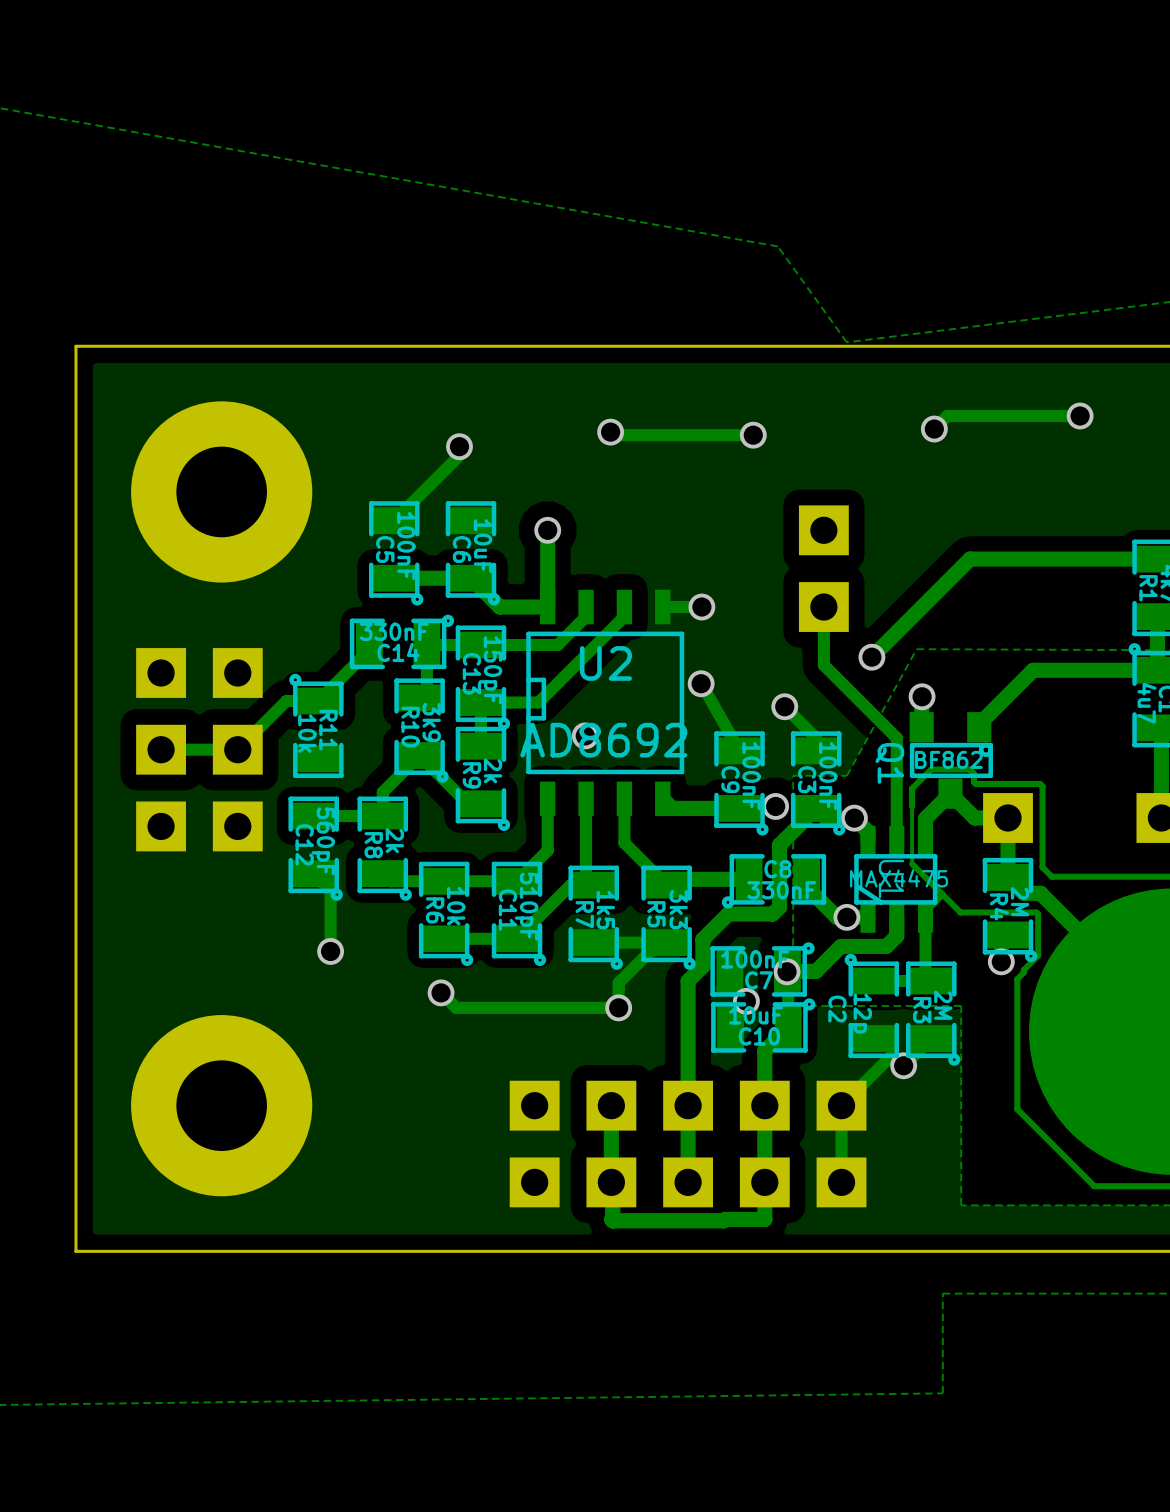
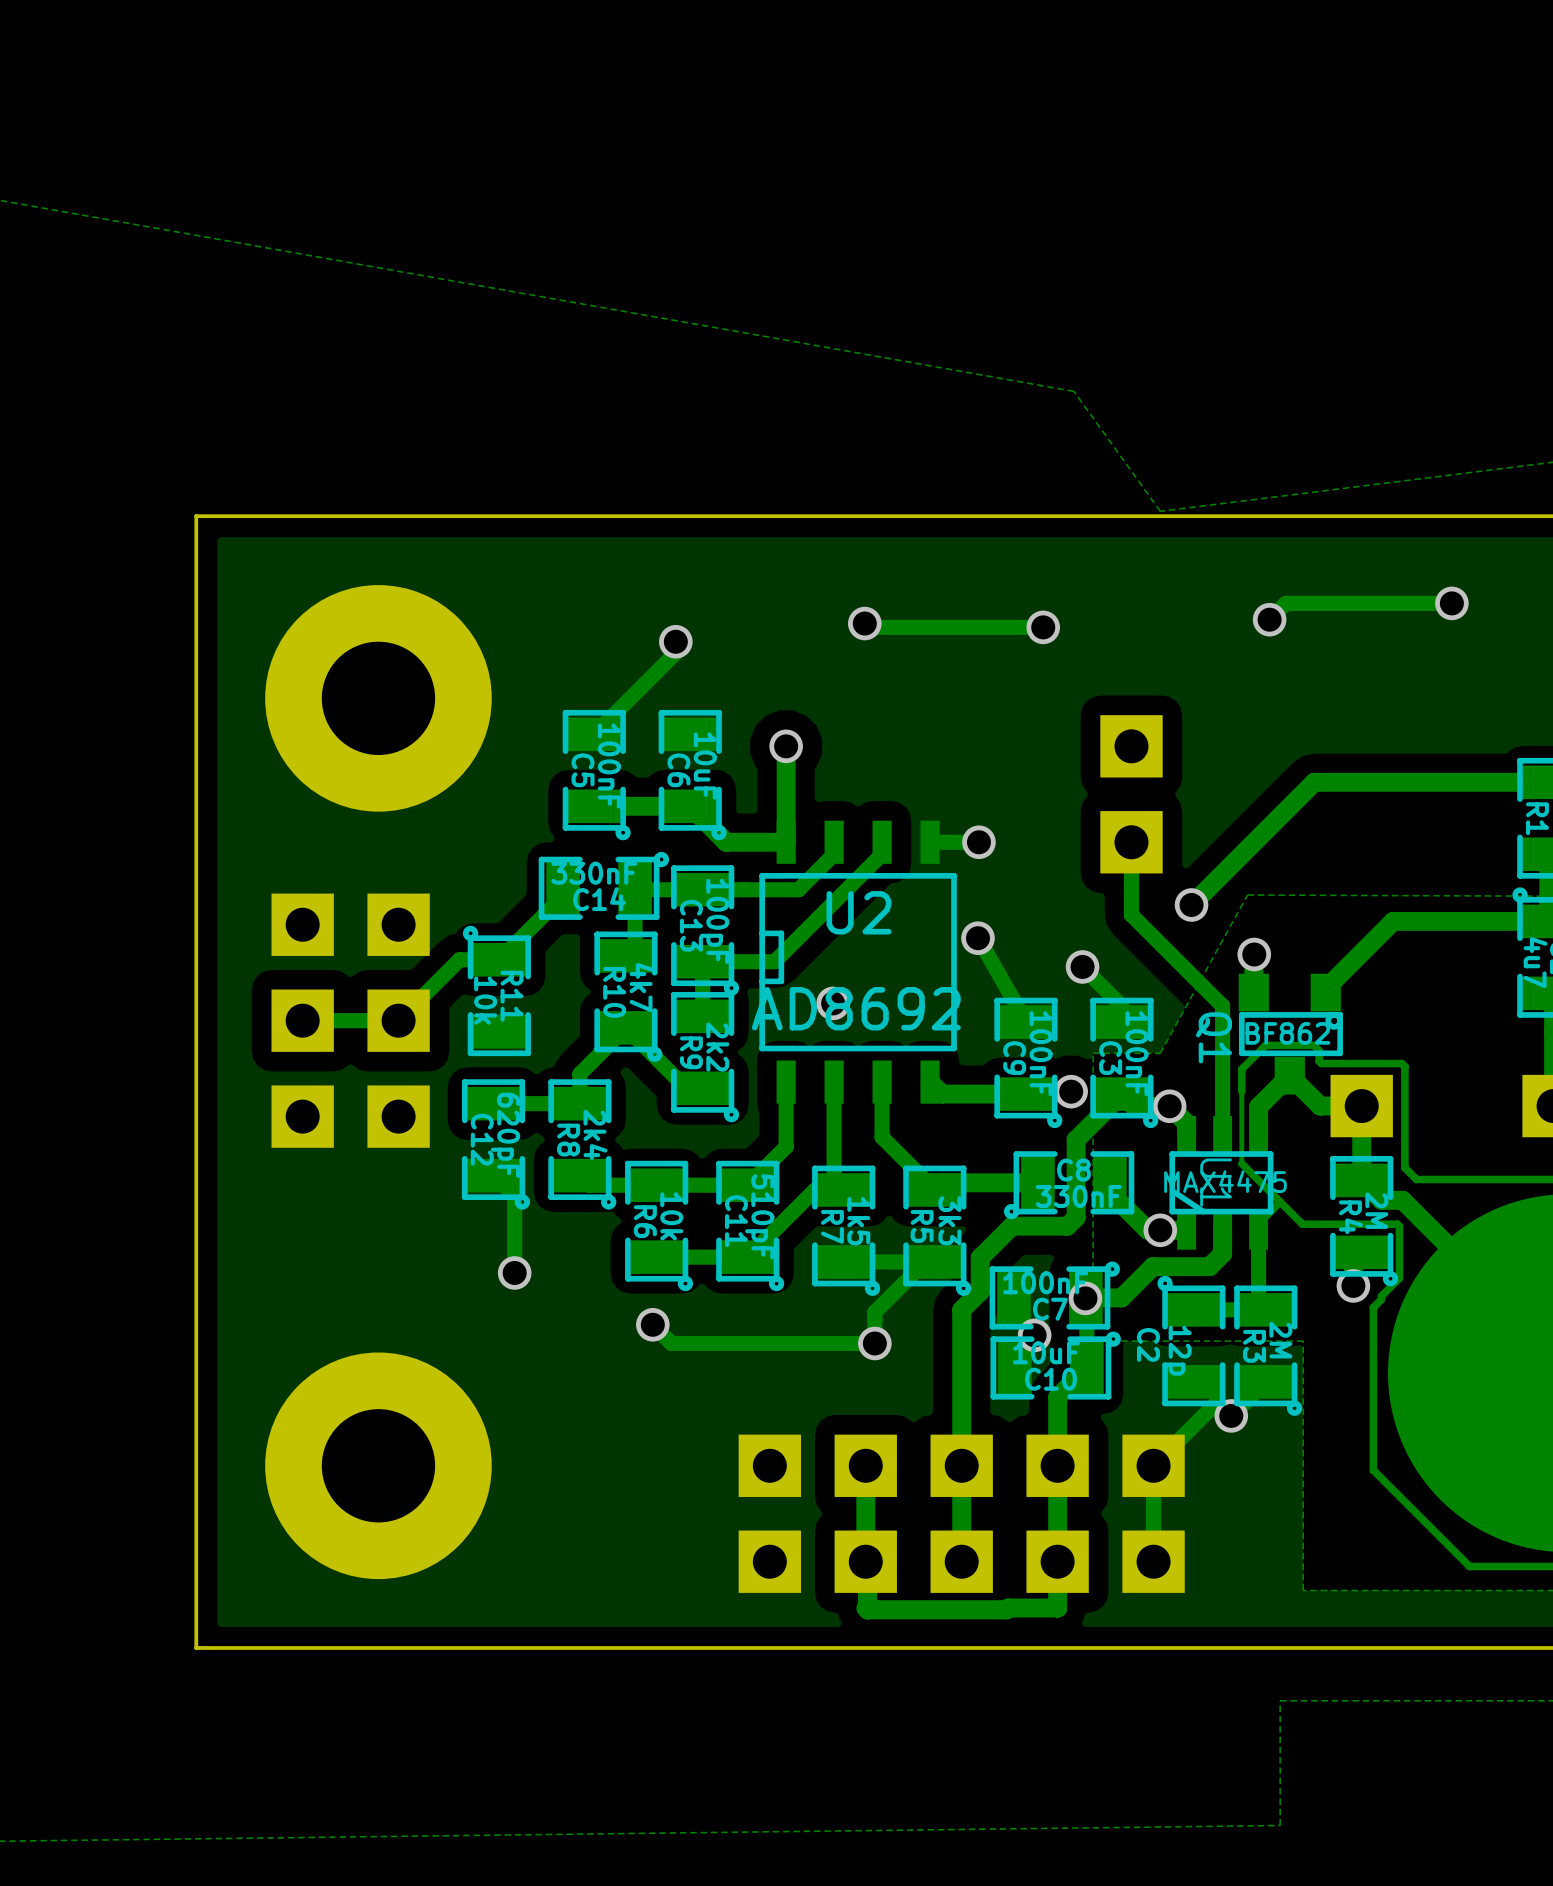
C13 value: 150pF (490, 670) -> 100pF (714, 921)
R10 value: 3k9 (431, 722) -> 4k7 (641, 987)
R9 value: 2k (493, 770) -> 2k2 (717, 1047)
R8 value: 2k (394, 840) -> 2k4 (595, 1134)
C12 value: 560pF (323, 841) -> 620pF (505, 1135)

